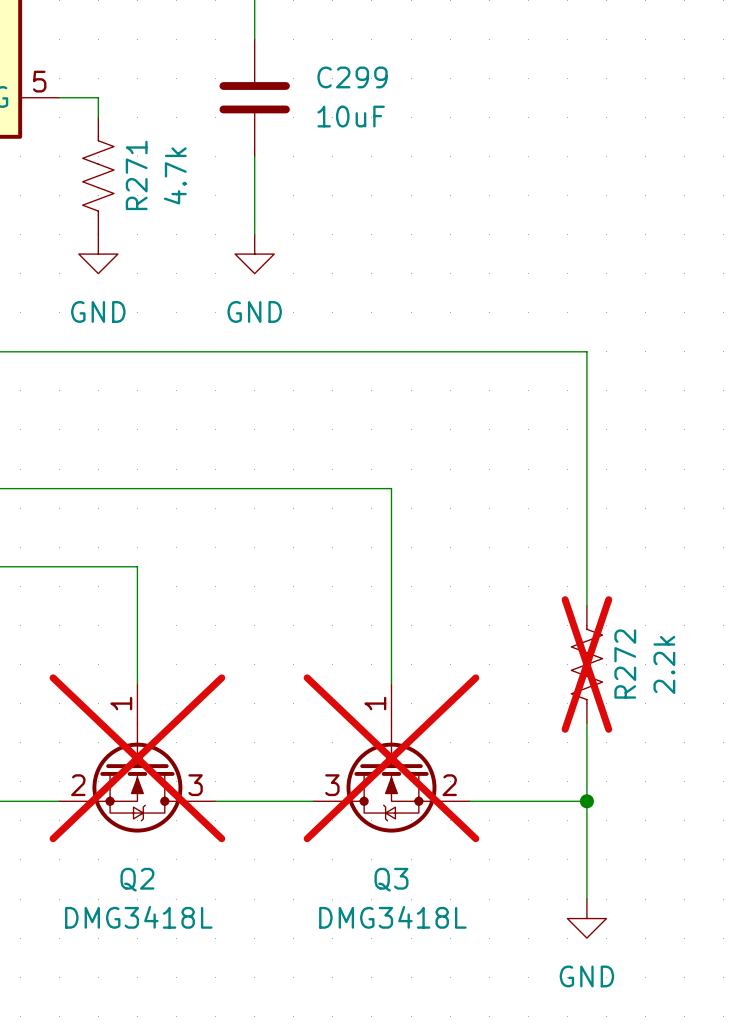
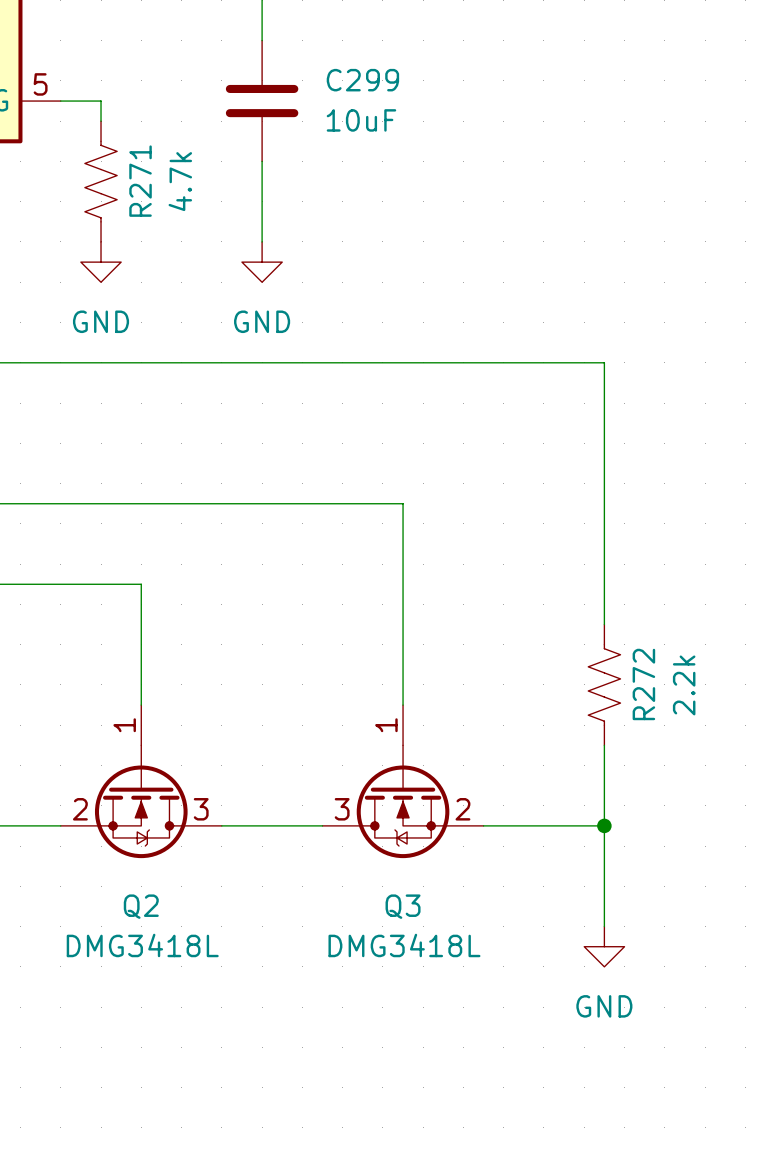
R272 do-not-place cross: (586, 664) -> none
Q2 do-not-place cross: (137, 758) -> none
Q3 do-not-place cross: (391, 758) -> none

